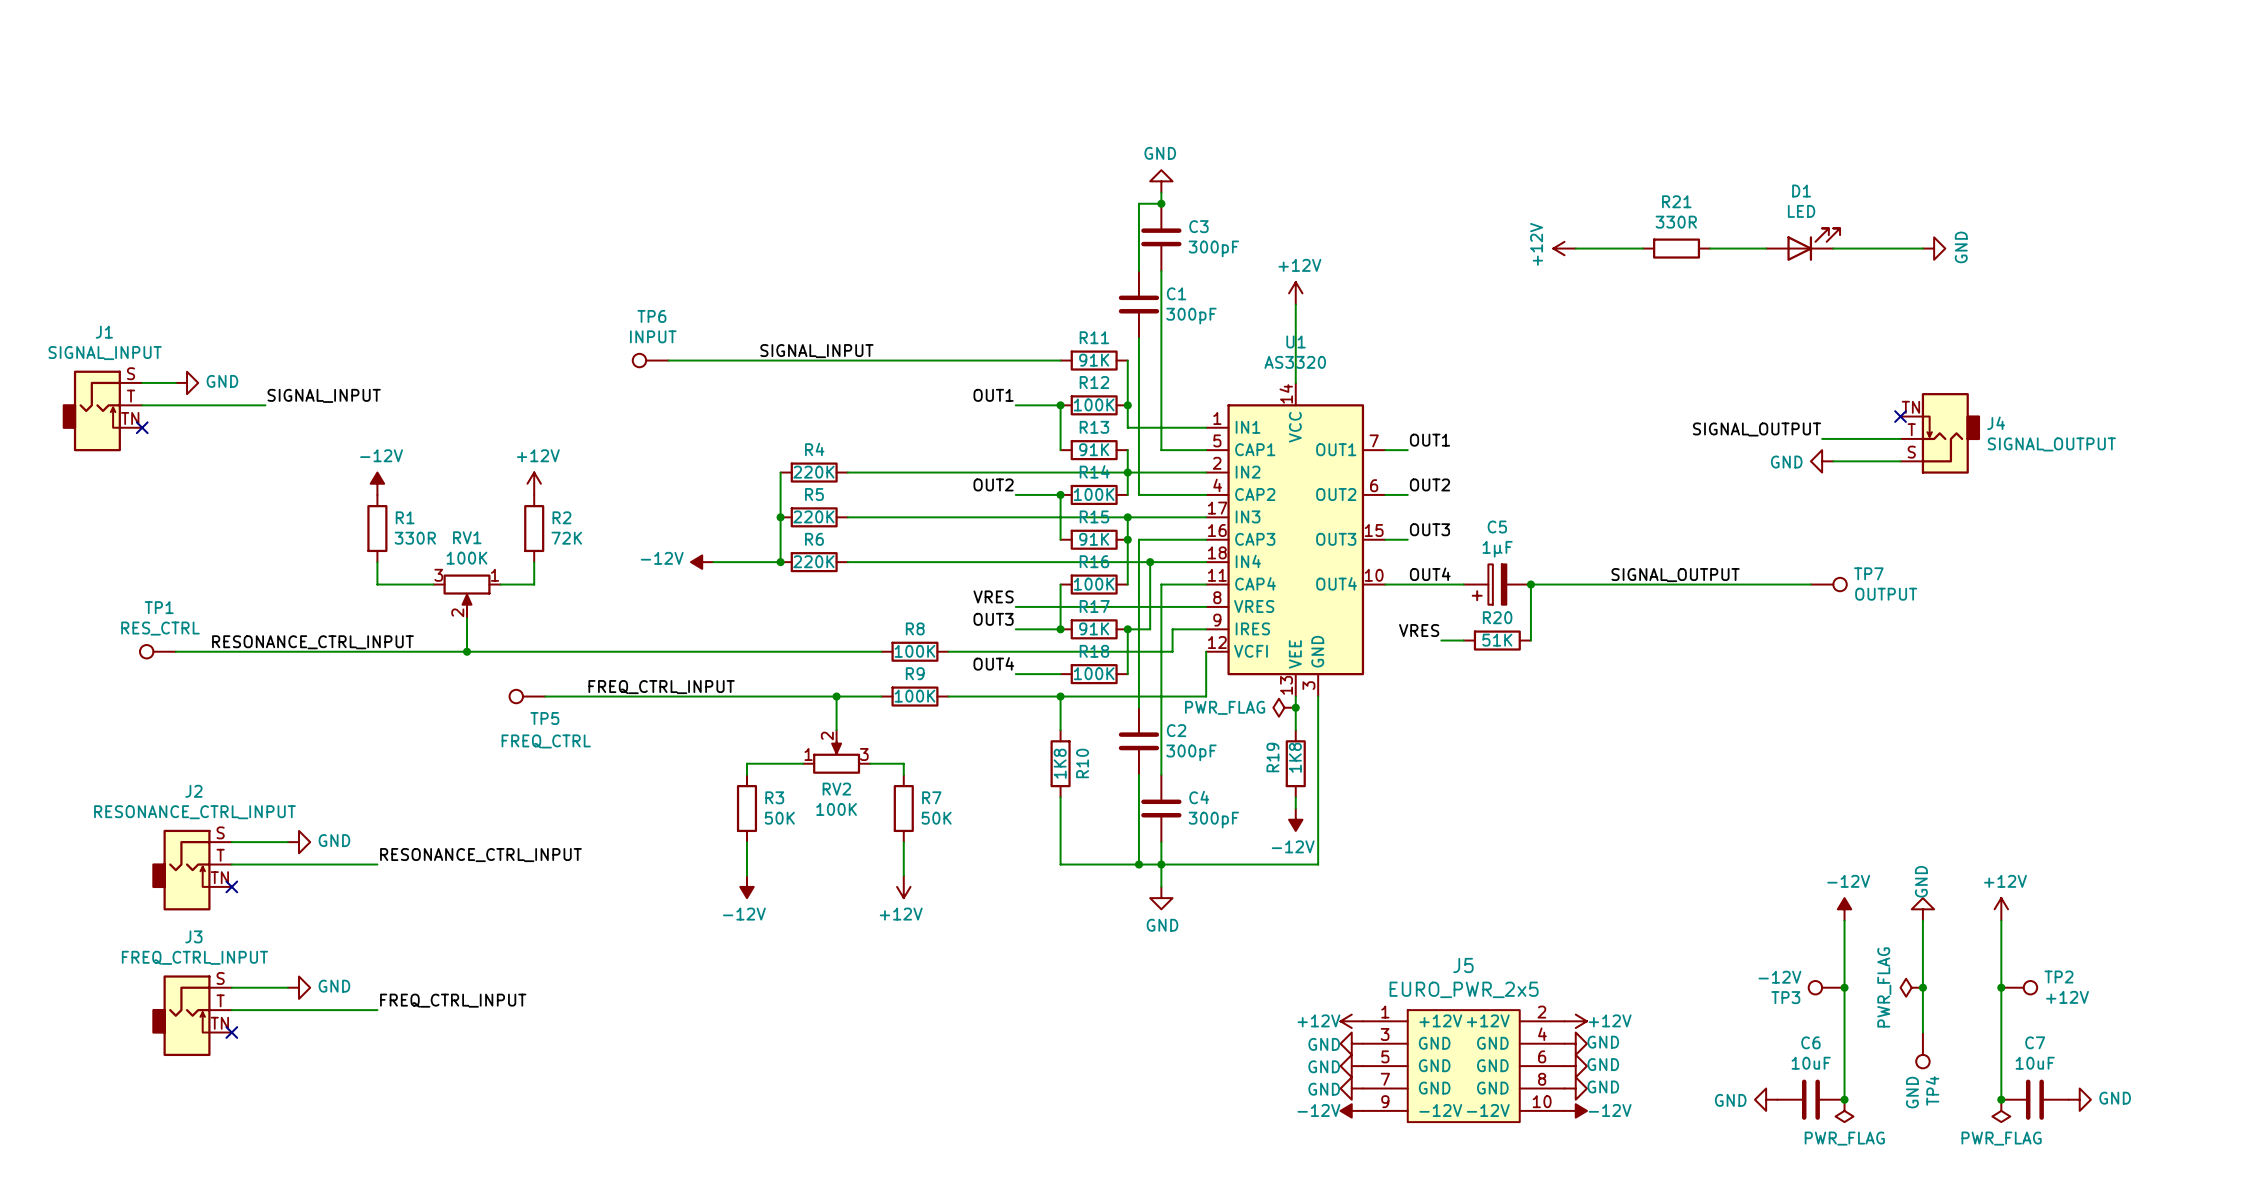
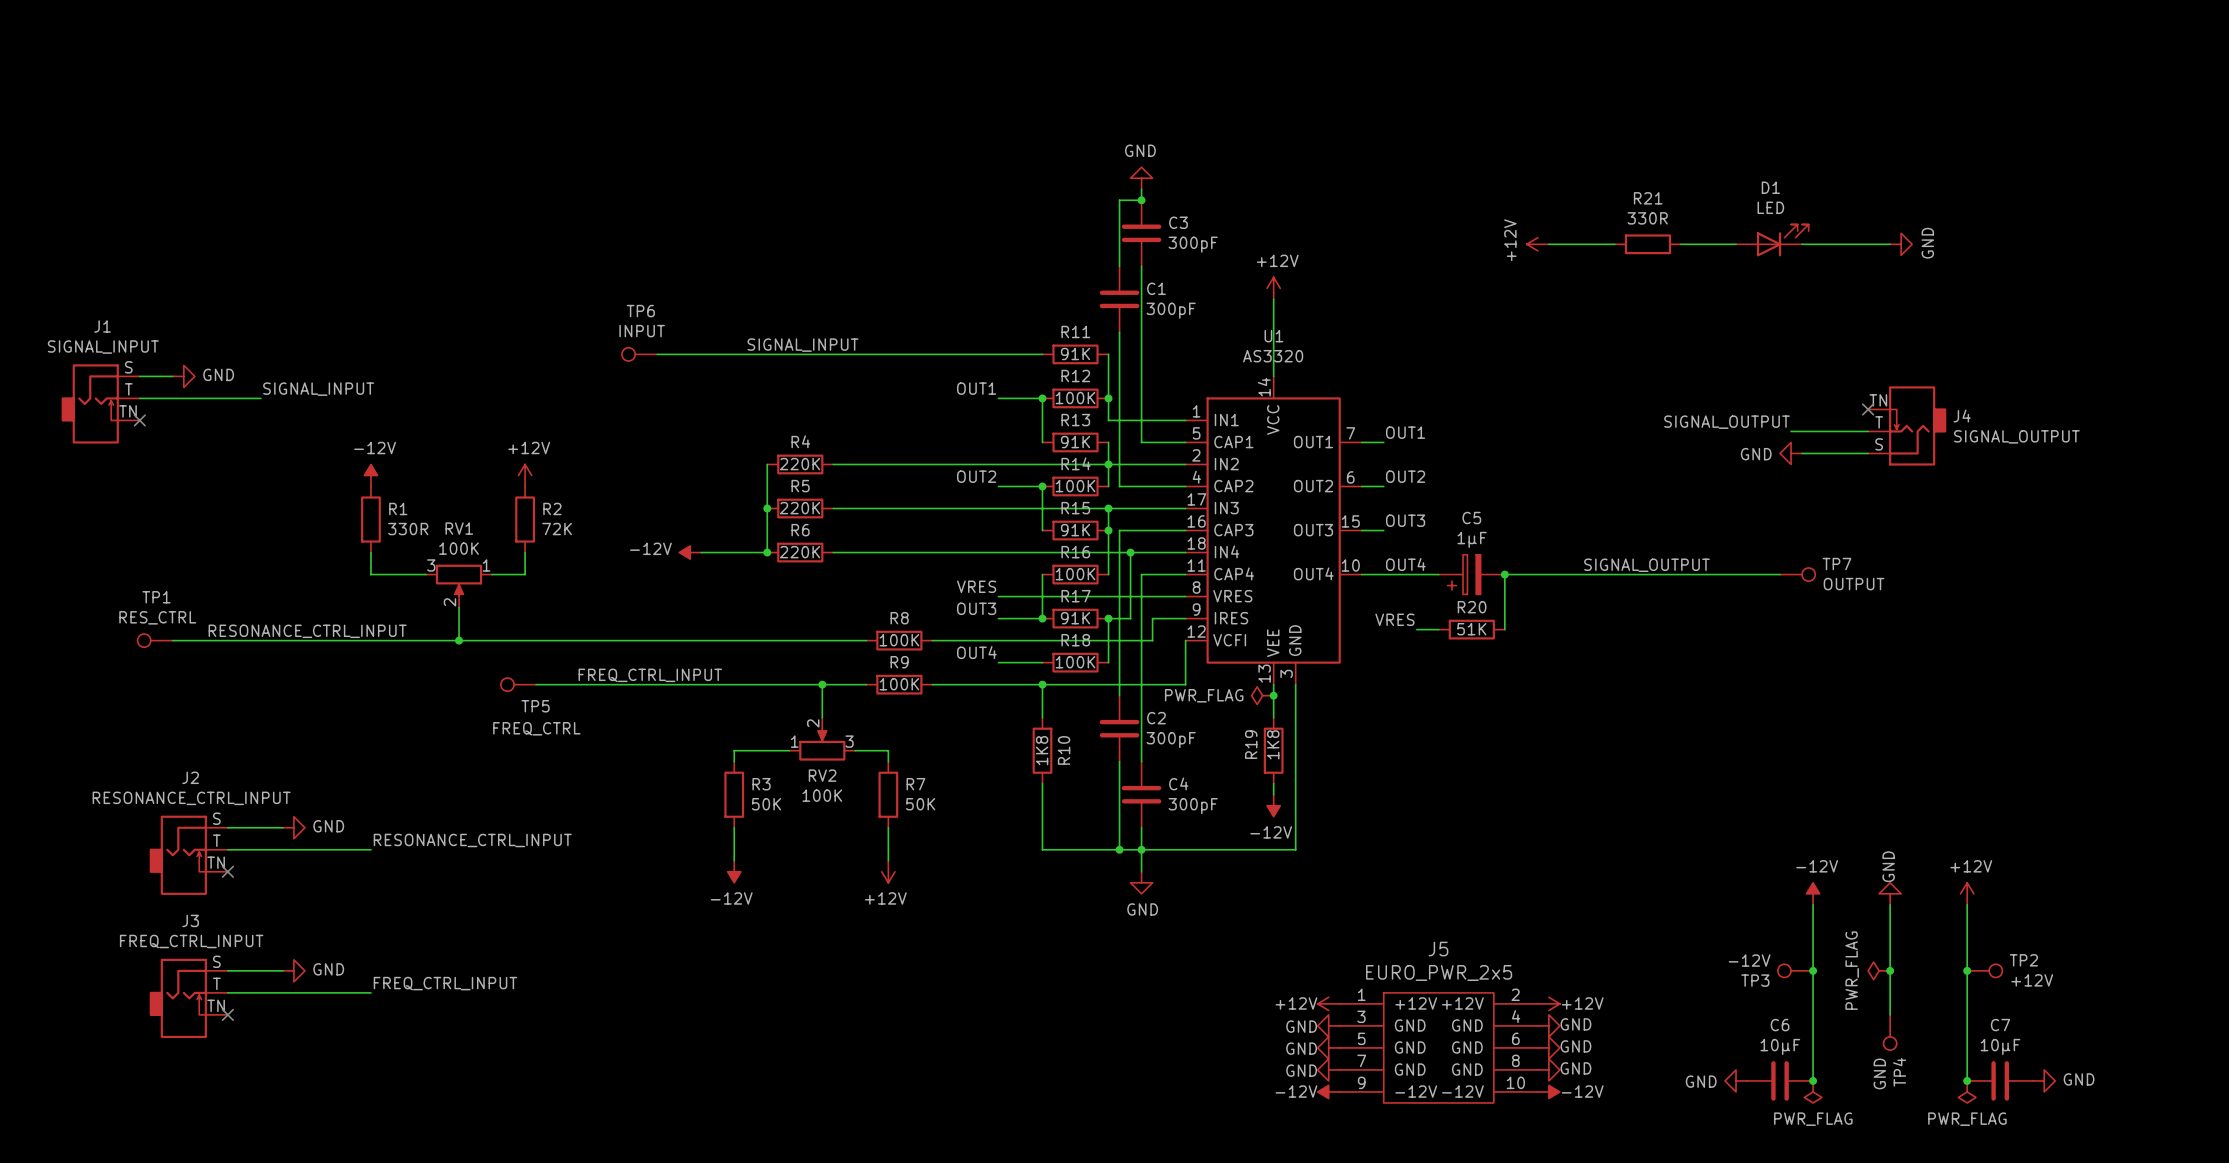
C6 value: 10uF (1811, 1063) -> 10µF (1780, 1046)
C7 value: 10uF (2035, 1063) -> 10µF (2000, 1046)

